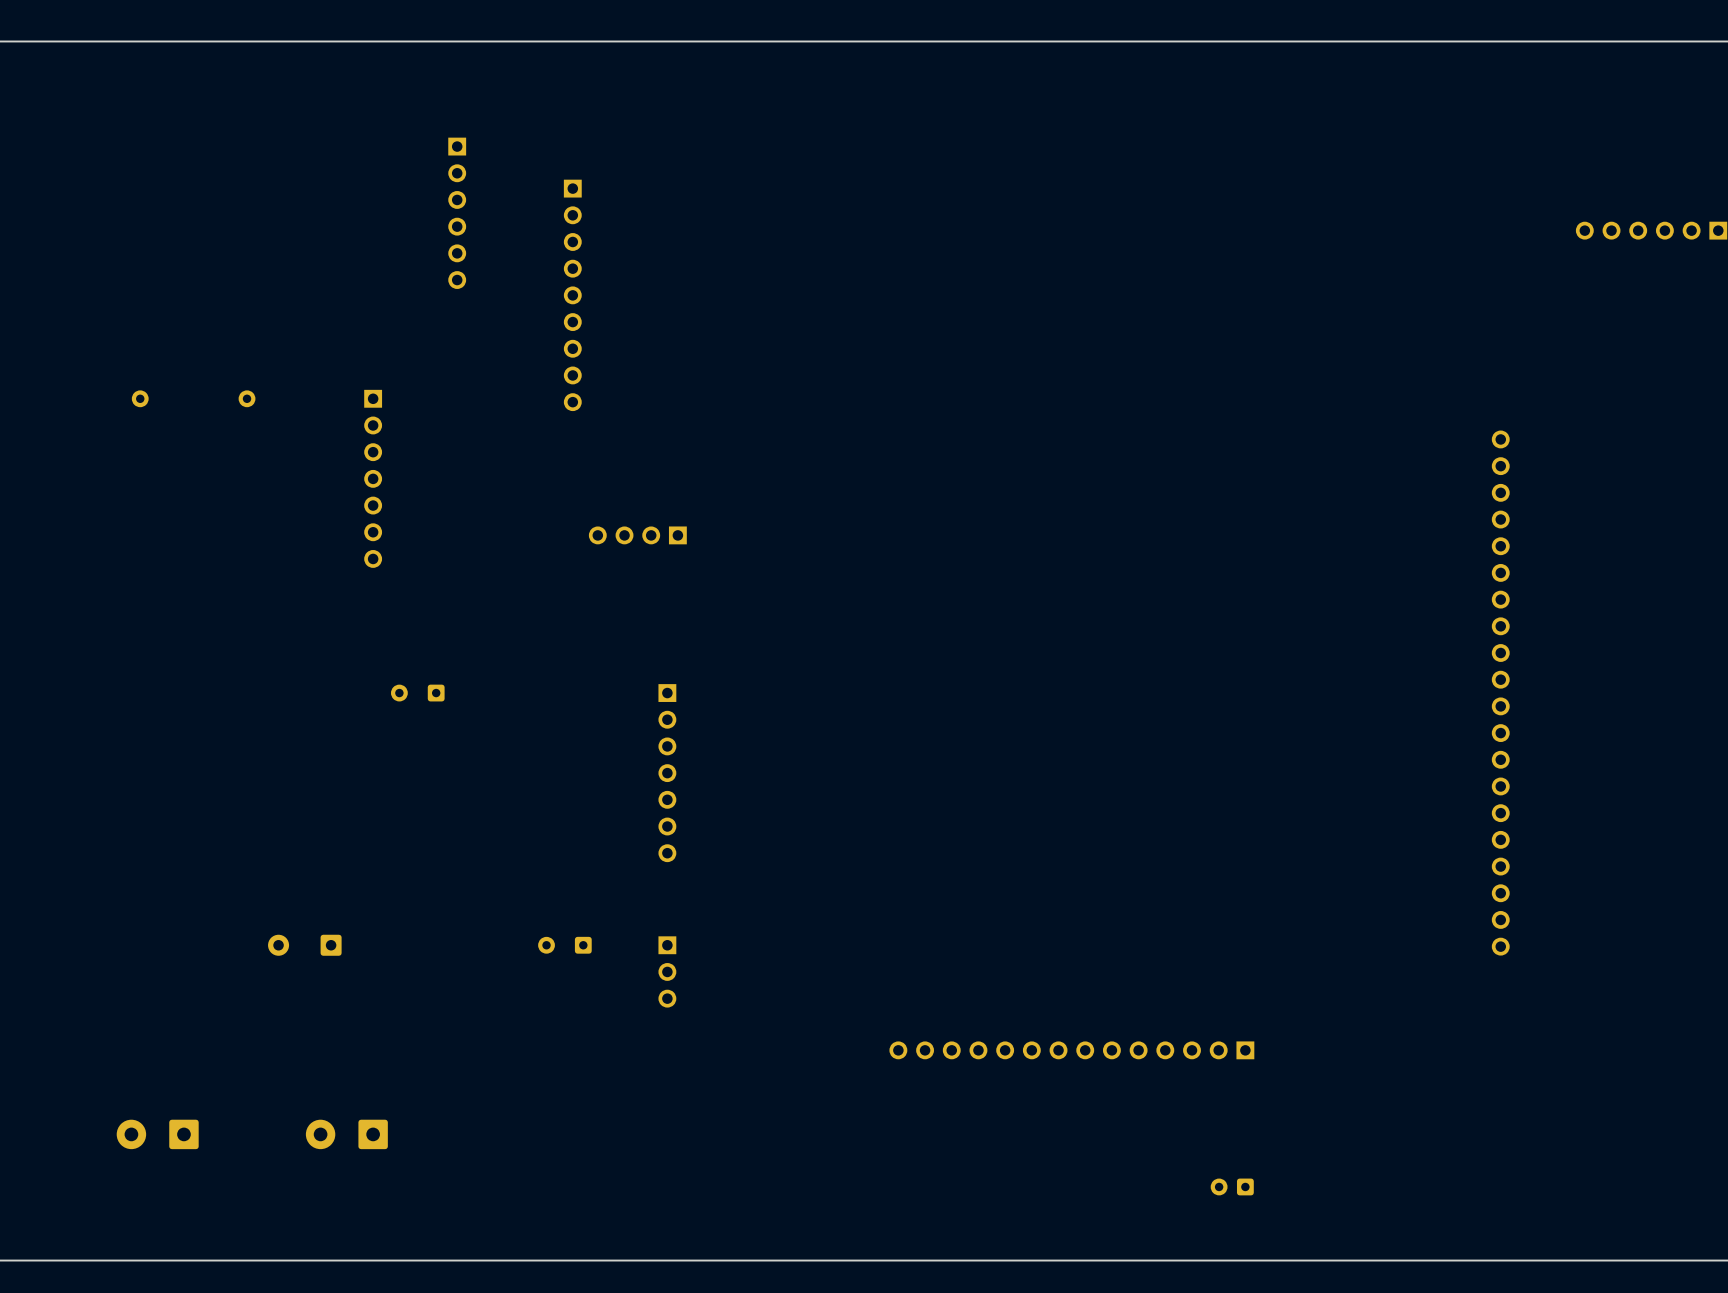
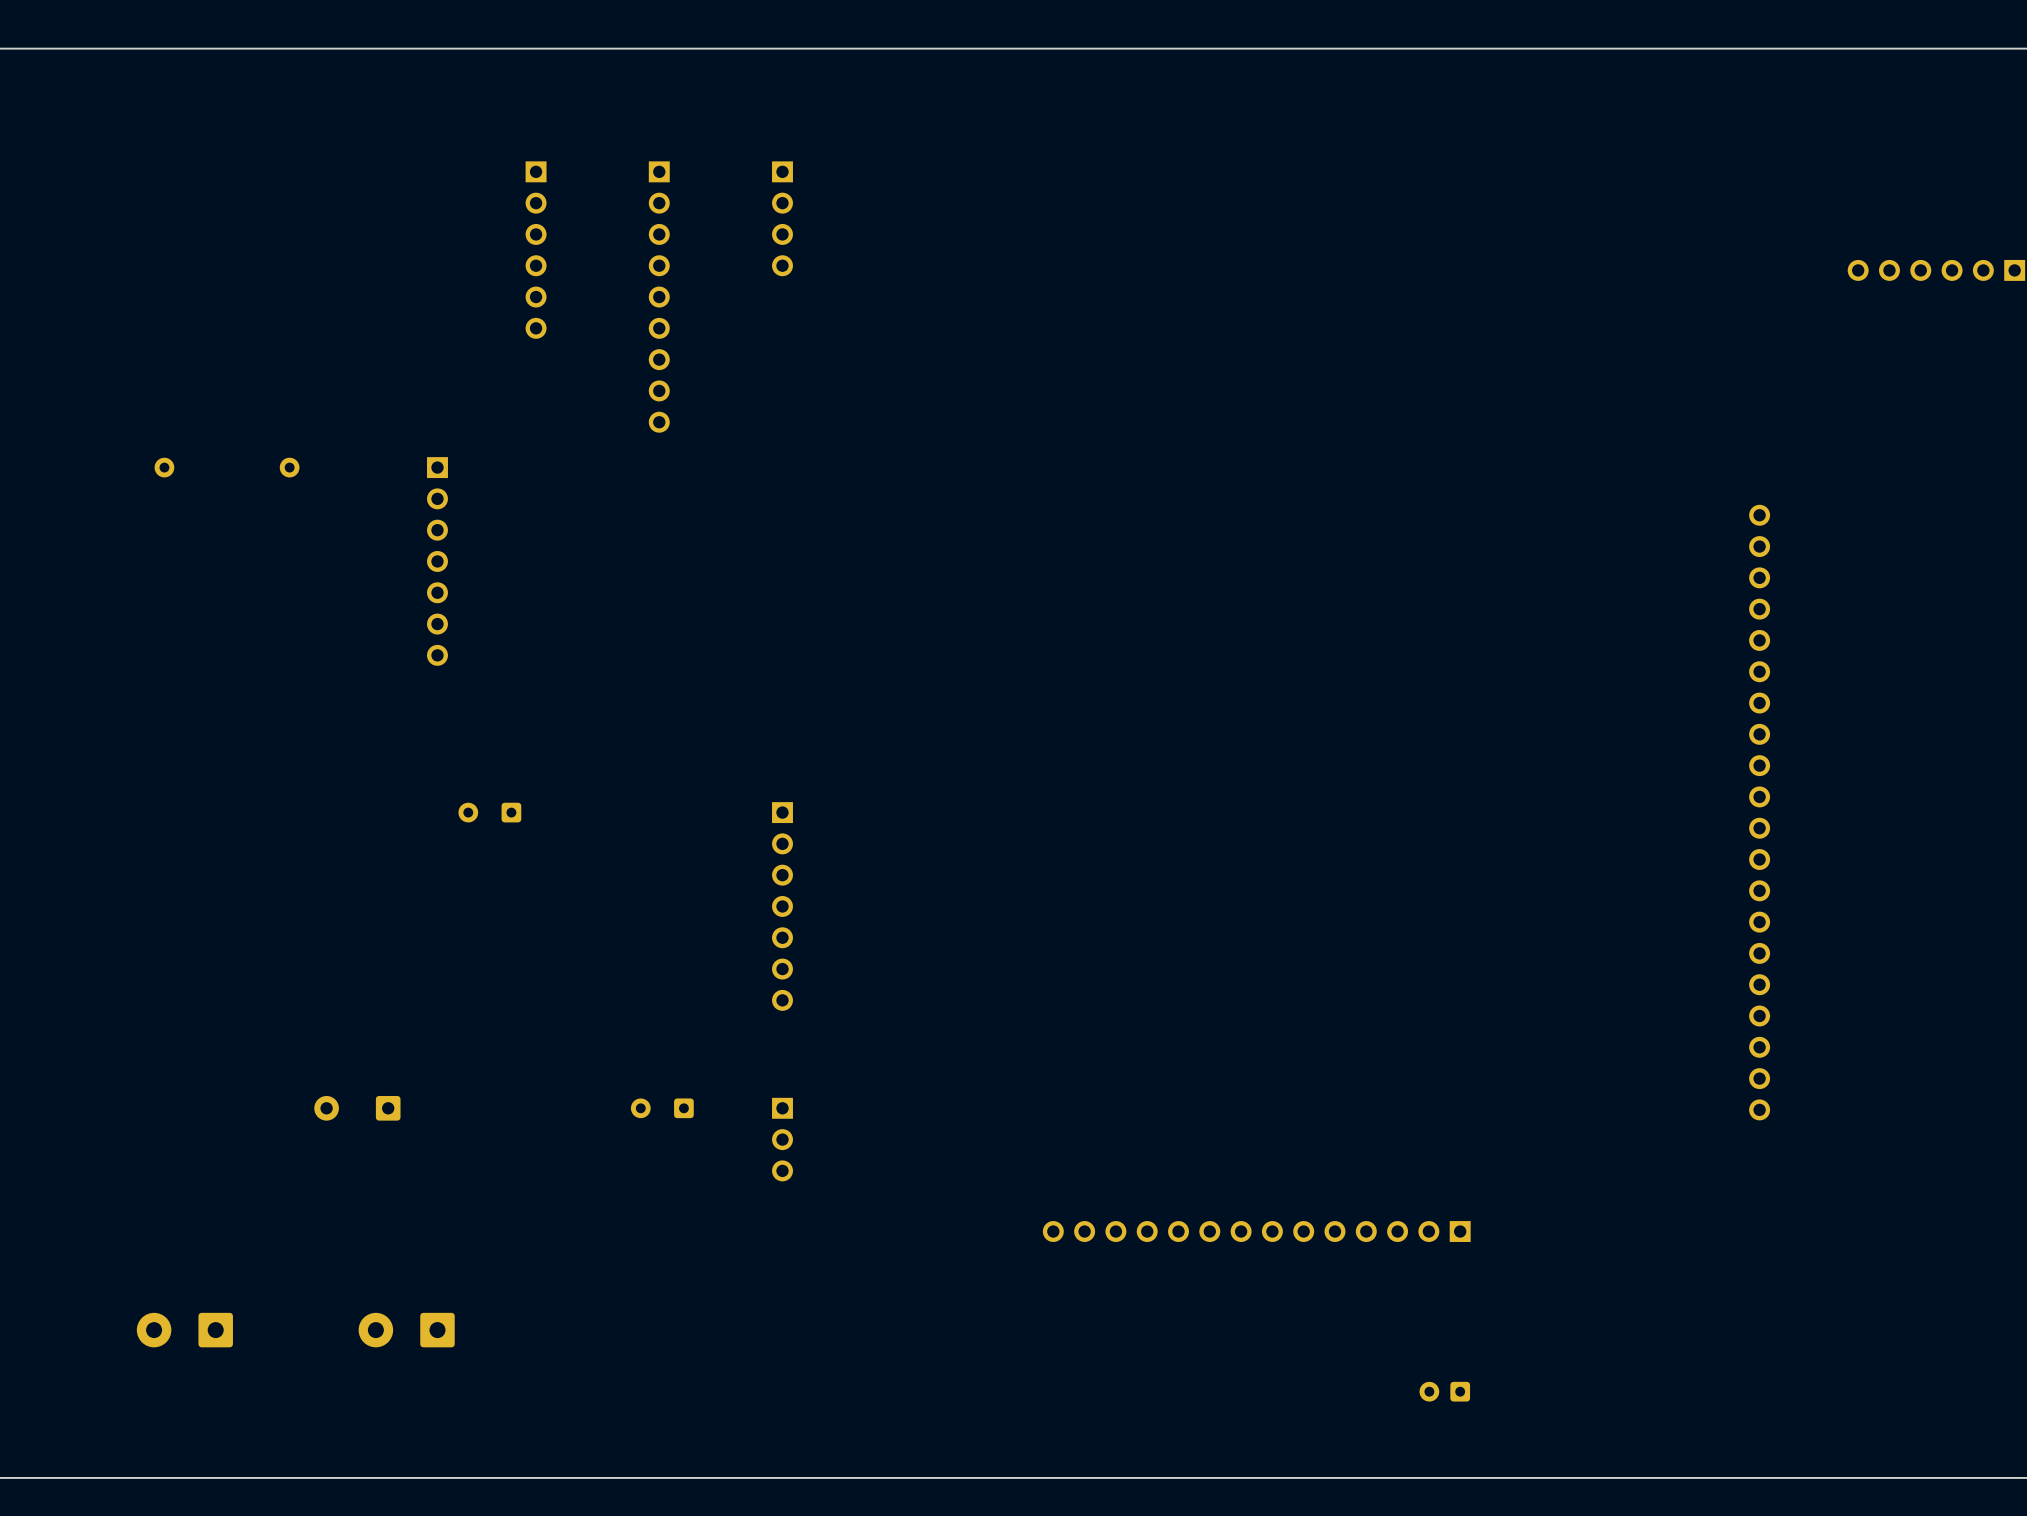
part: none -> (782, 218)
part position: (572, 295) -> (659, 297)
part: (637, 535) -> none

